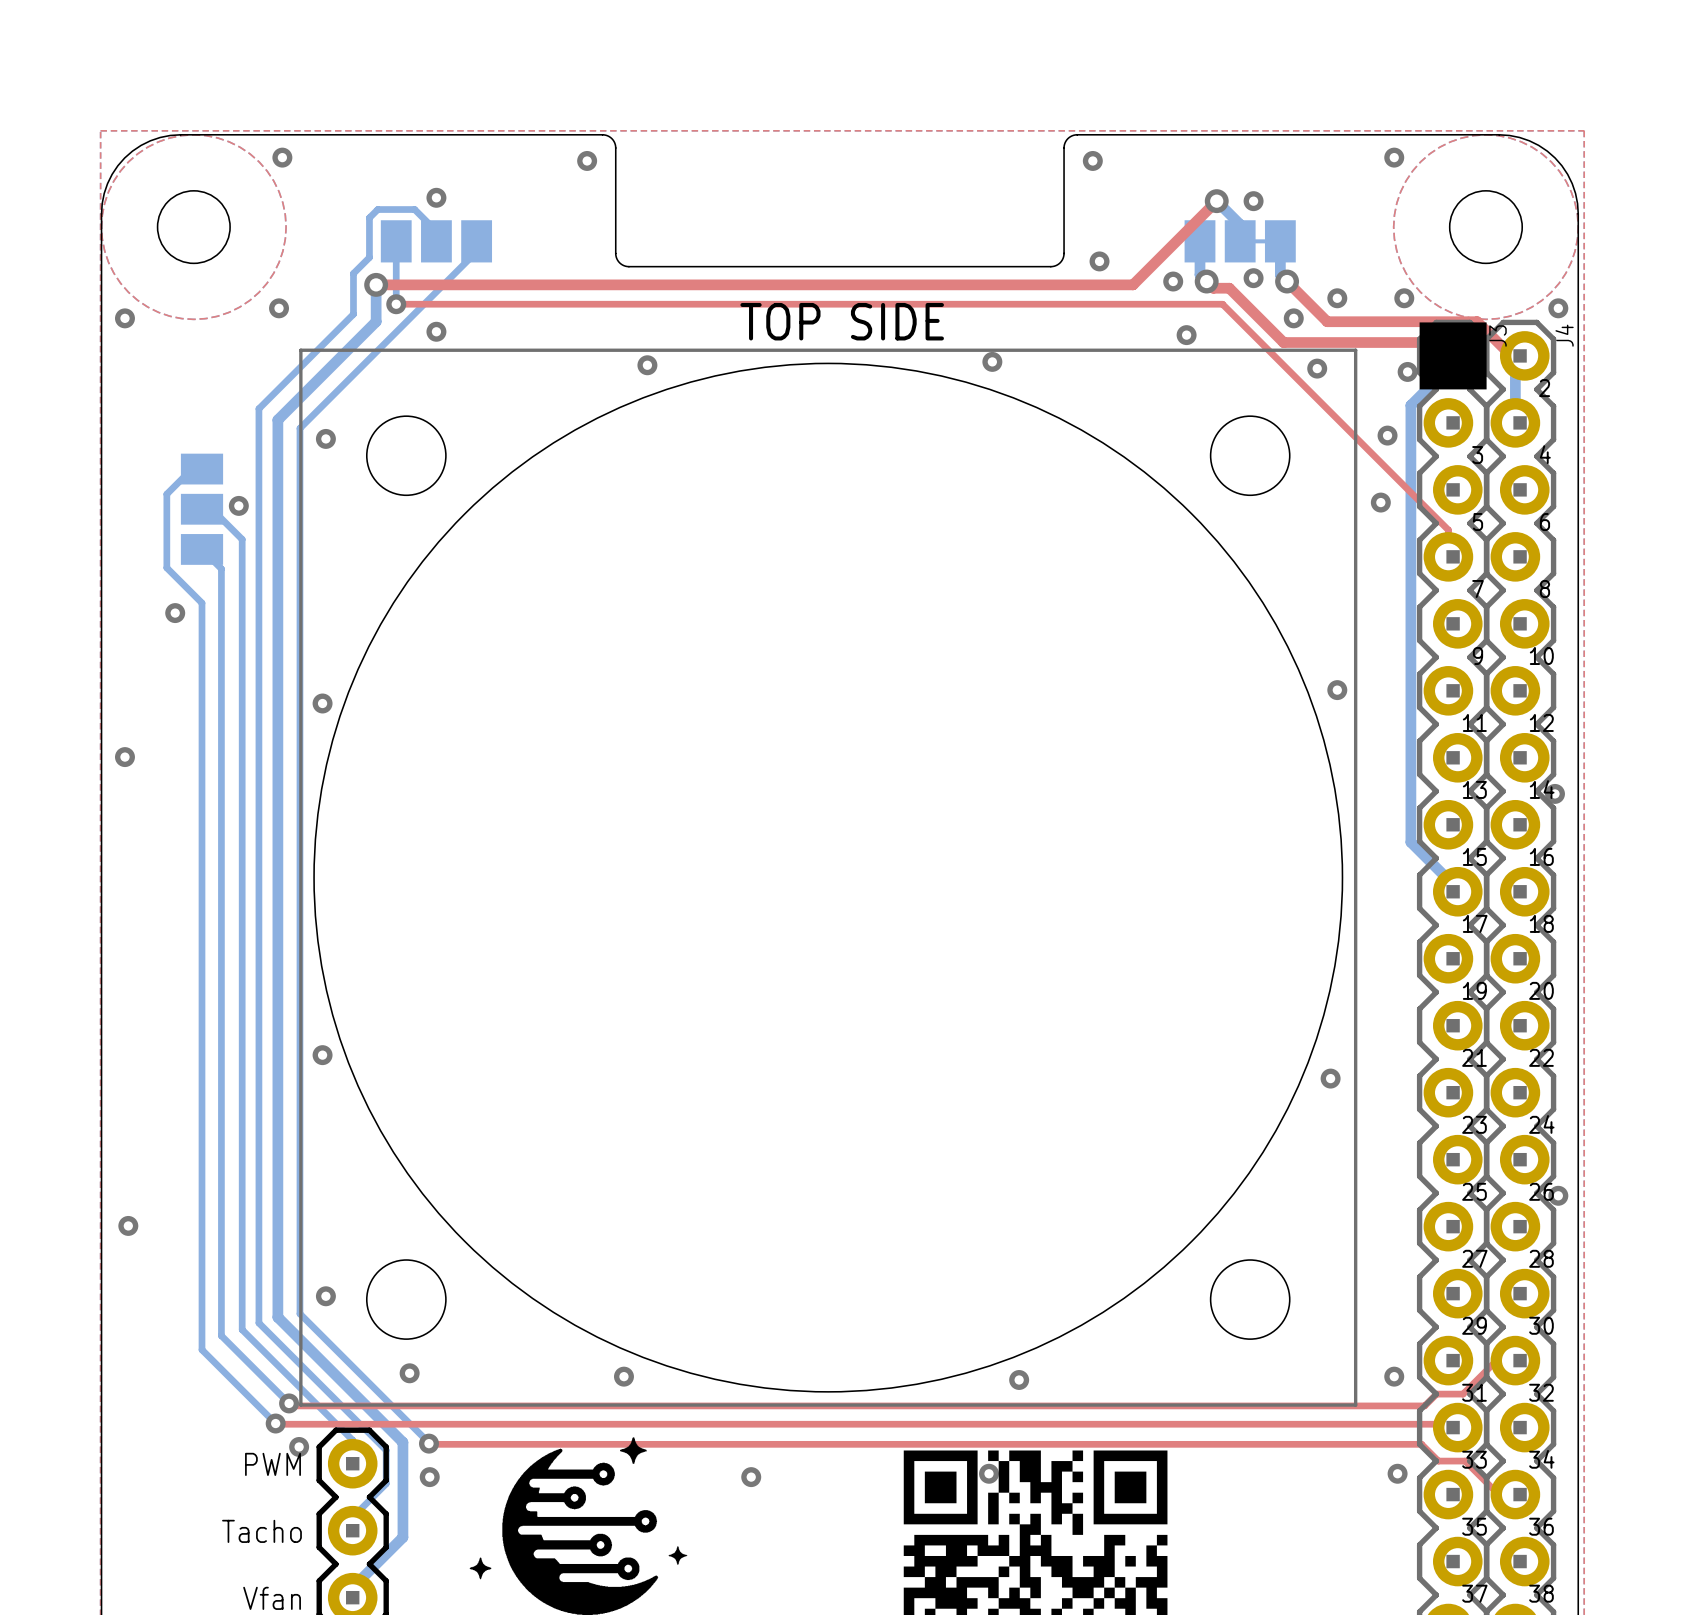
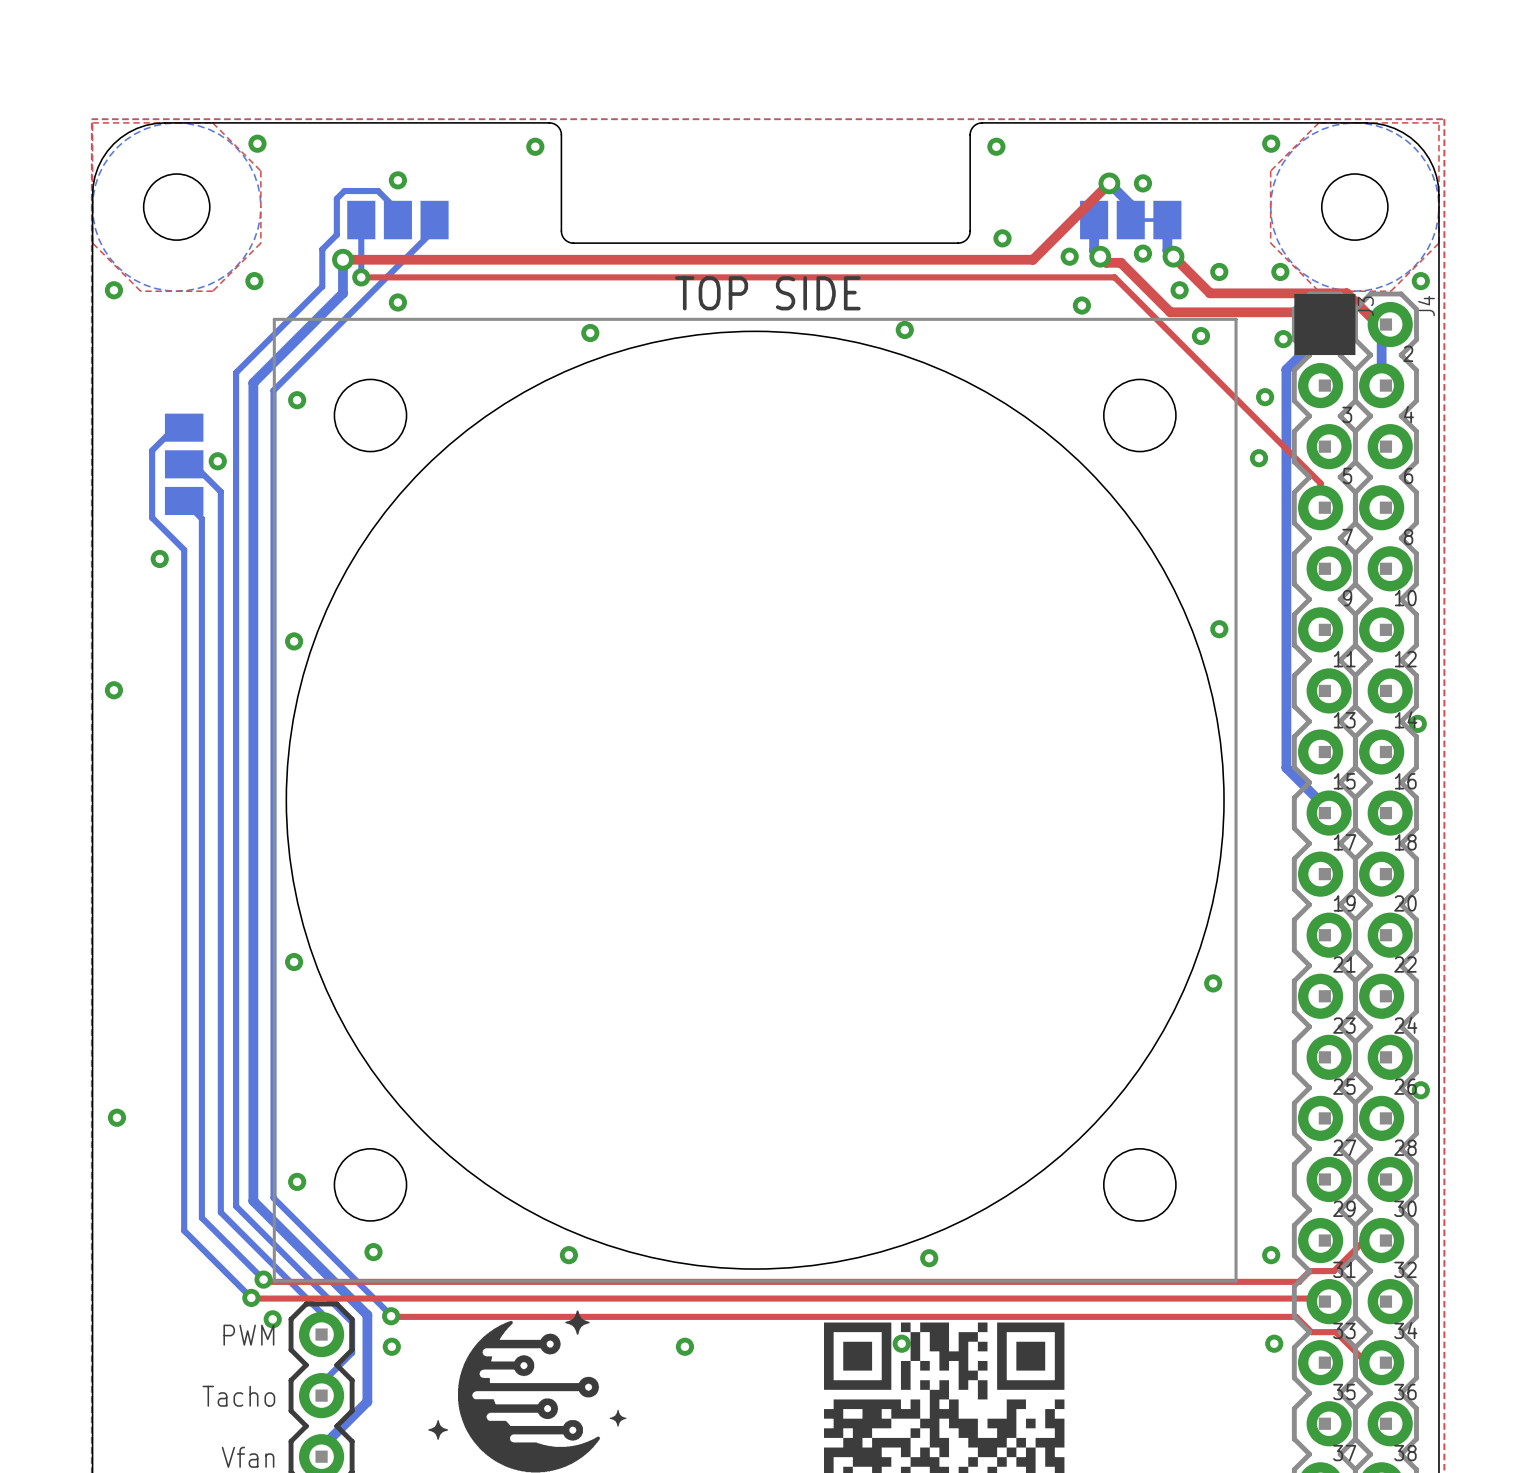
top zone outline: (193, 134) (169, 137) (158, 141) (147, 147) (128, 161) (120, 170) (108, 191) (102, 215) (101, 227) (102, 239) (108, 262) (120, 283) (128, 292) (137, 300) (158, 312) (169, 316) (193, 319) (217, 316) (229, 312) (250, 300) (259, 292) (267, 283) (279, 262) (285, 239) (286, 227) (285, 215) (279, 191) (267, 170) (259, 161) (239, 147) (229, 141) (217, 137) (193, 134) -> (92, 122) (92, 243) (140, 291) (212, 291) (260, 243) (260, 170) (212, 122) (92, 122)
top zone outline: (1485, 134) (1462, 137) (1450, 141) (1439, 147) (1420, 161) (1412, 170) (1400, 191) (1396, 203) (1393, 227) (1396, 250) (1400, 262) (1412, 283) (1420, 292) (1429, 300) (1450, 312) (1462, 316) (1485, 319) (1509, 316) (1521, 312) (1542, 300) (1551, 292) (1559, 283) (1571, 262) (1575, 250) (1578, 227) (1575, 203) (1571, 191) (1559, 170) (1551, 161) (1532, 147) (1521, 141) (1509, 137) (1485, 134) -> (1318, 122) (1270, 170) (1270, 243) (1318, 291) (1390, 291) (1438, 243) (1438, 122) (1318, 122)

